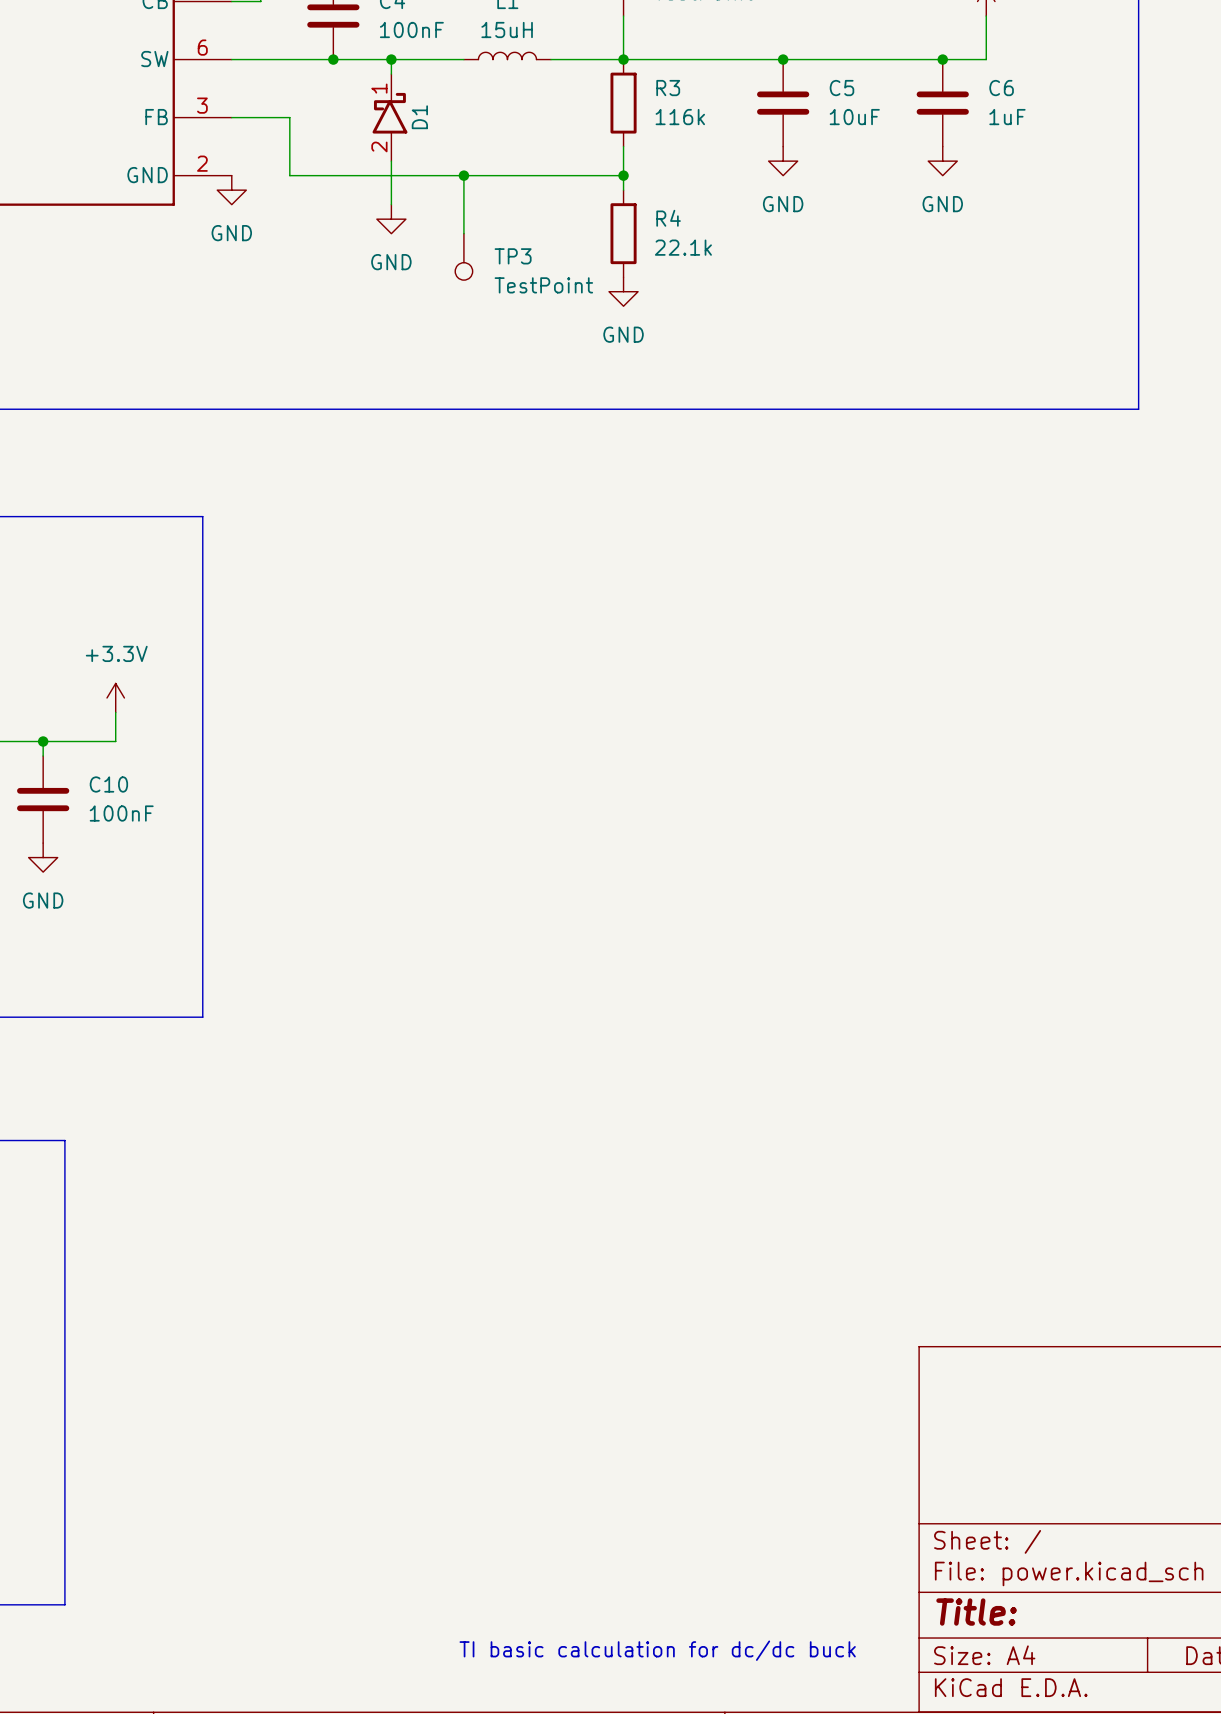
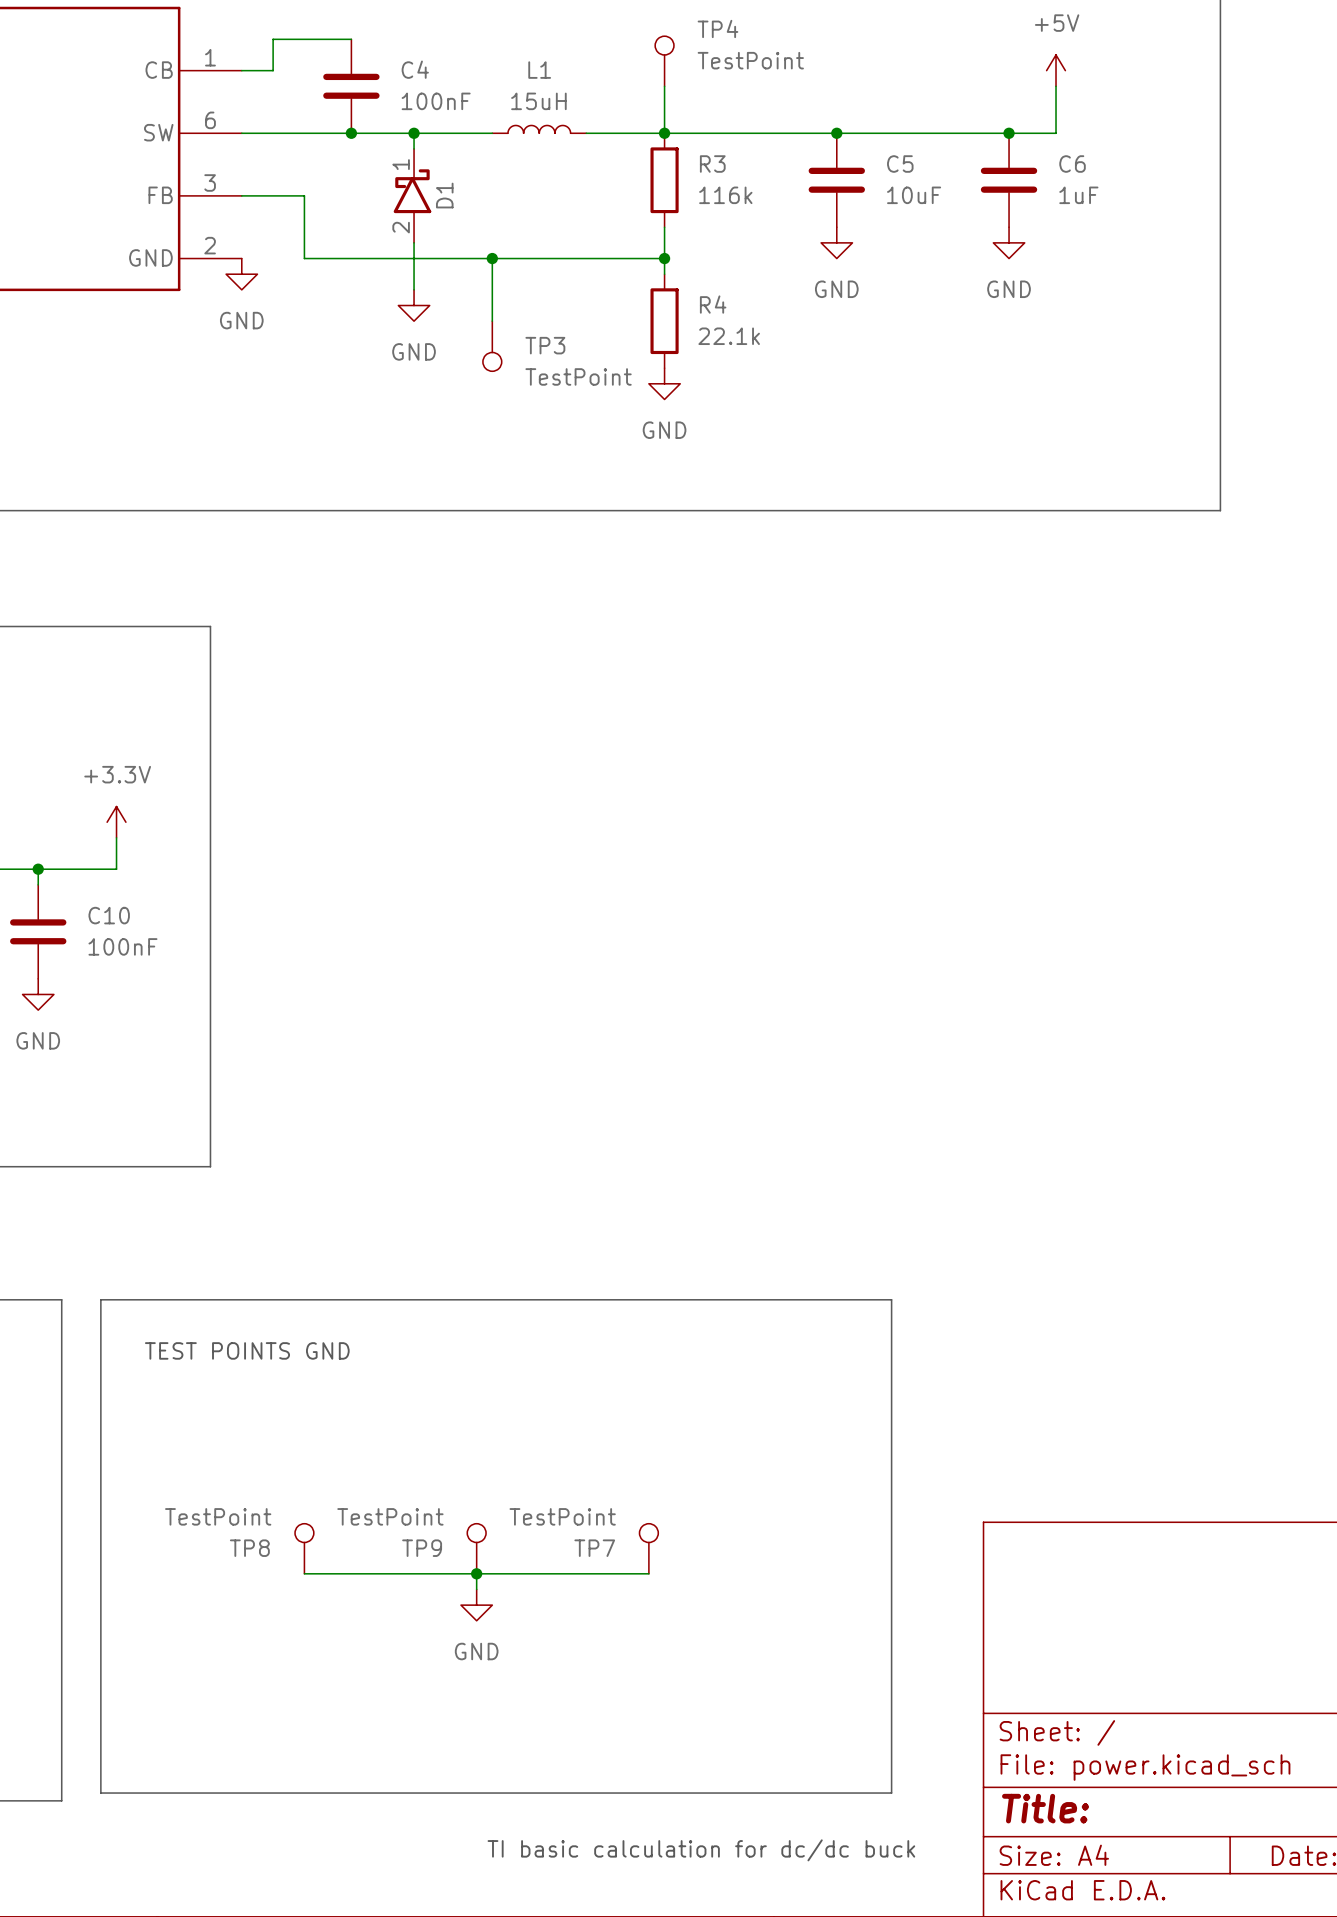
line: none -> (100, 1299) (891, 1299) (891, 1793) (100, 1793) (100, 1299)
text: none -> TEST POINTS GND (247, 1350)
TP8: none -> TestPoint (304, 1548)
TP9: none -> TestPoint (476, 1548)
TP7: none -> TestPoint (648, 1548)
wire: none -> (304, 1573) (648, 1573)
wire: none -> (476, 1573) (476, 1589)
junction: none -> (476, 1573)
power symbol: none -> GND (476, 1605)

